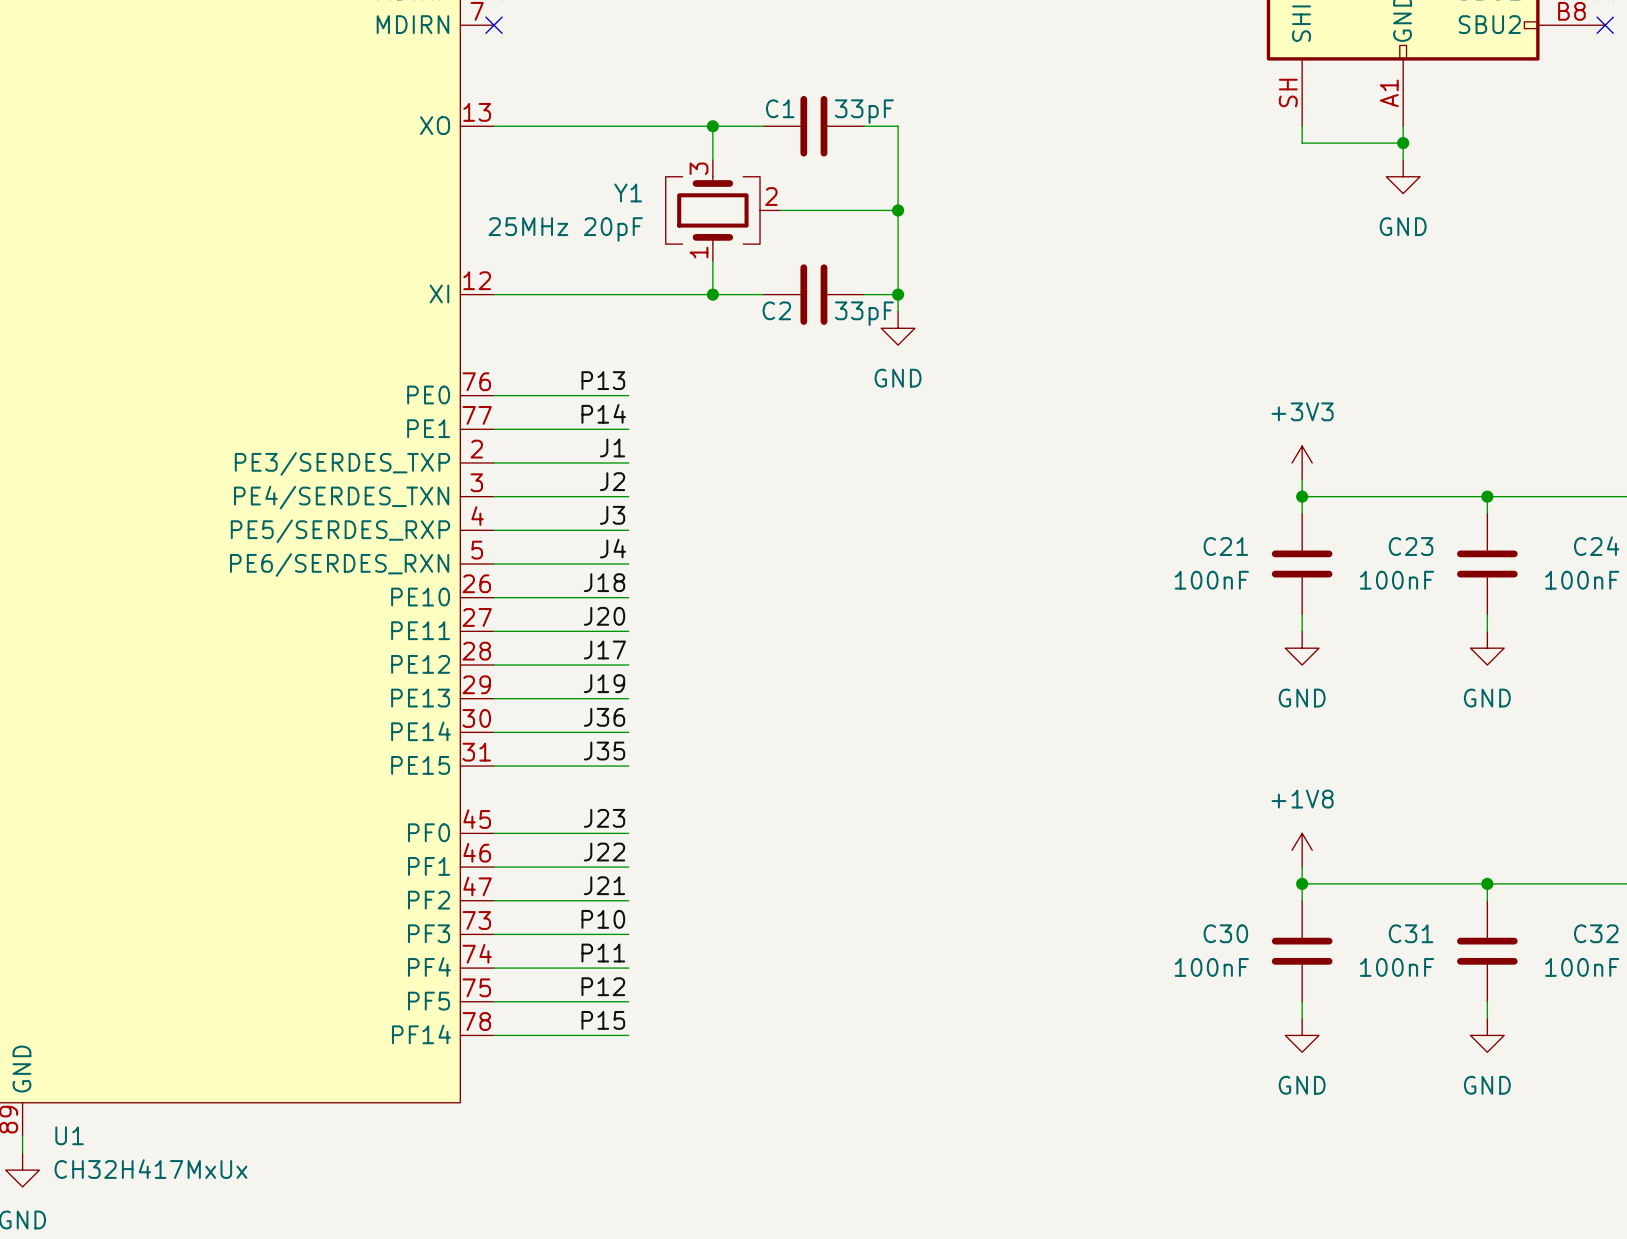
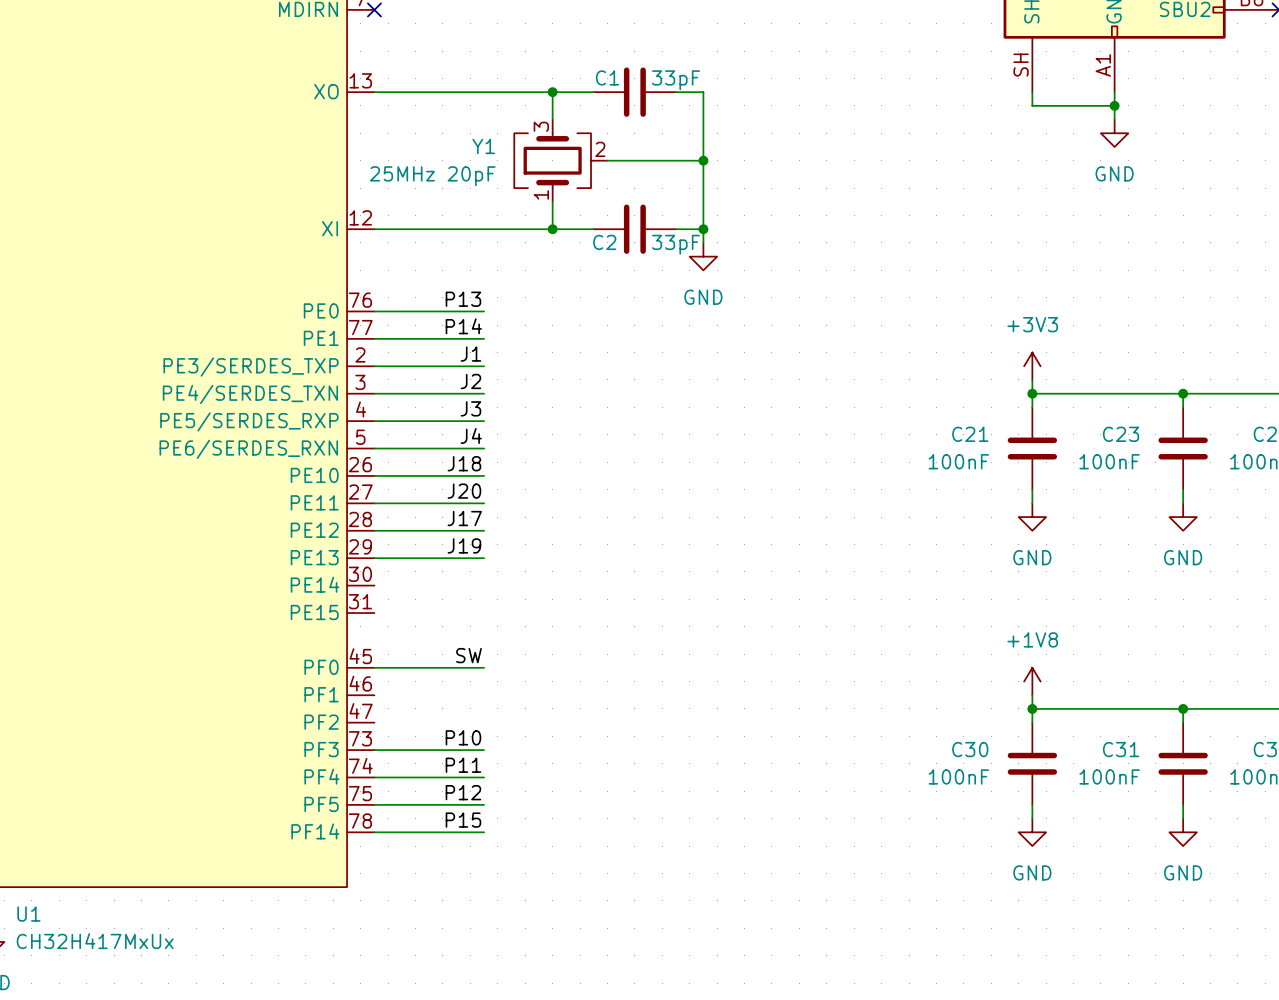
label: J36 (604, 717) -> none
wire: (494, 732) (628, 732) -> none
label: J35 (604, 751) -> none
wire: (494, 766) (628, 766) -> none
label: J23 (604, 818) -> SW (468, 655)
label: J22 (604, 852) -> none
wire: (494, 867) (628, 867) -> none
label: J21 (604, 885) -> none
wire: (494, 900) (628, 900) -> none

